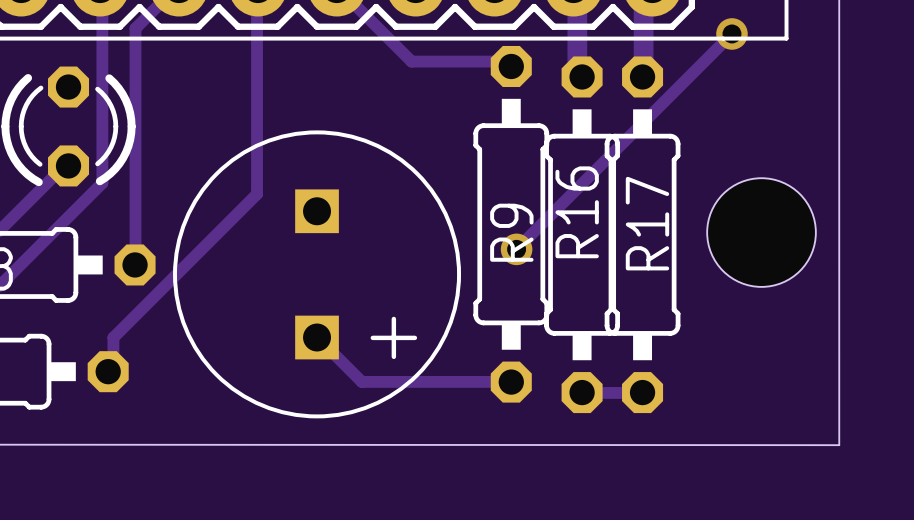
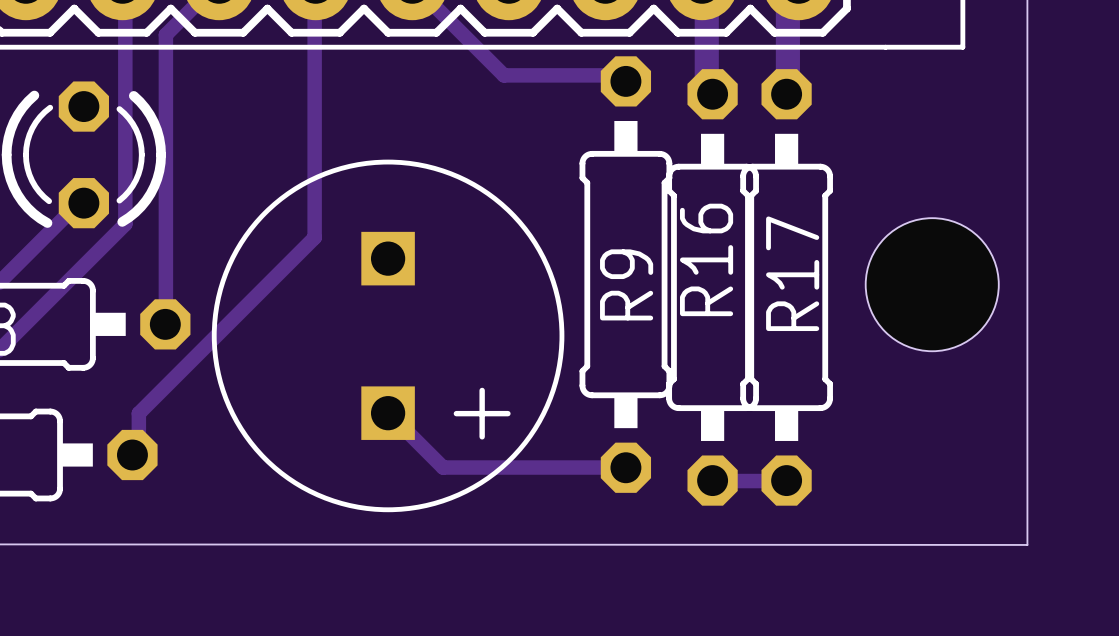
track: (731, 33) (516, 249) -> none
via: (731, 33) -> none
via: (516, 249) -> none

